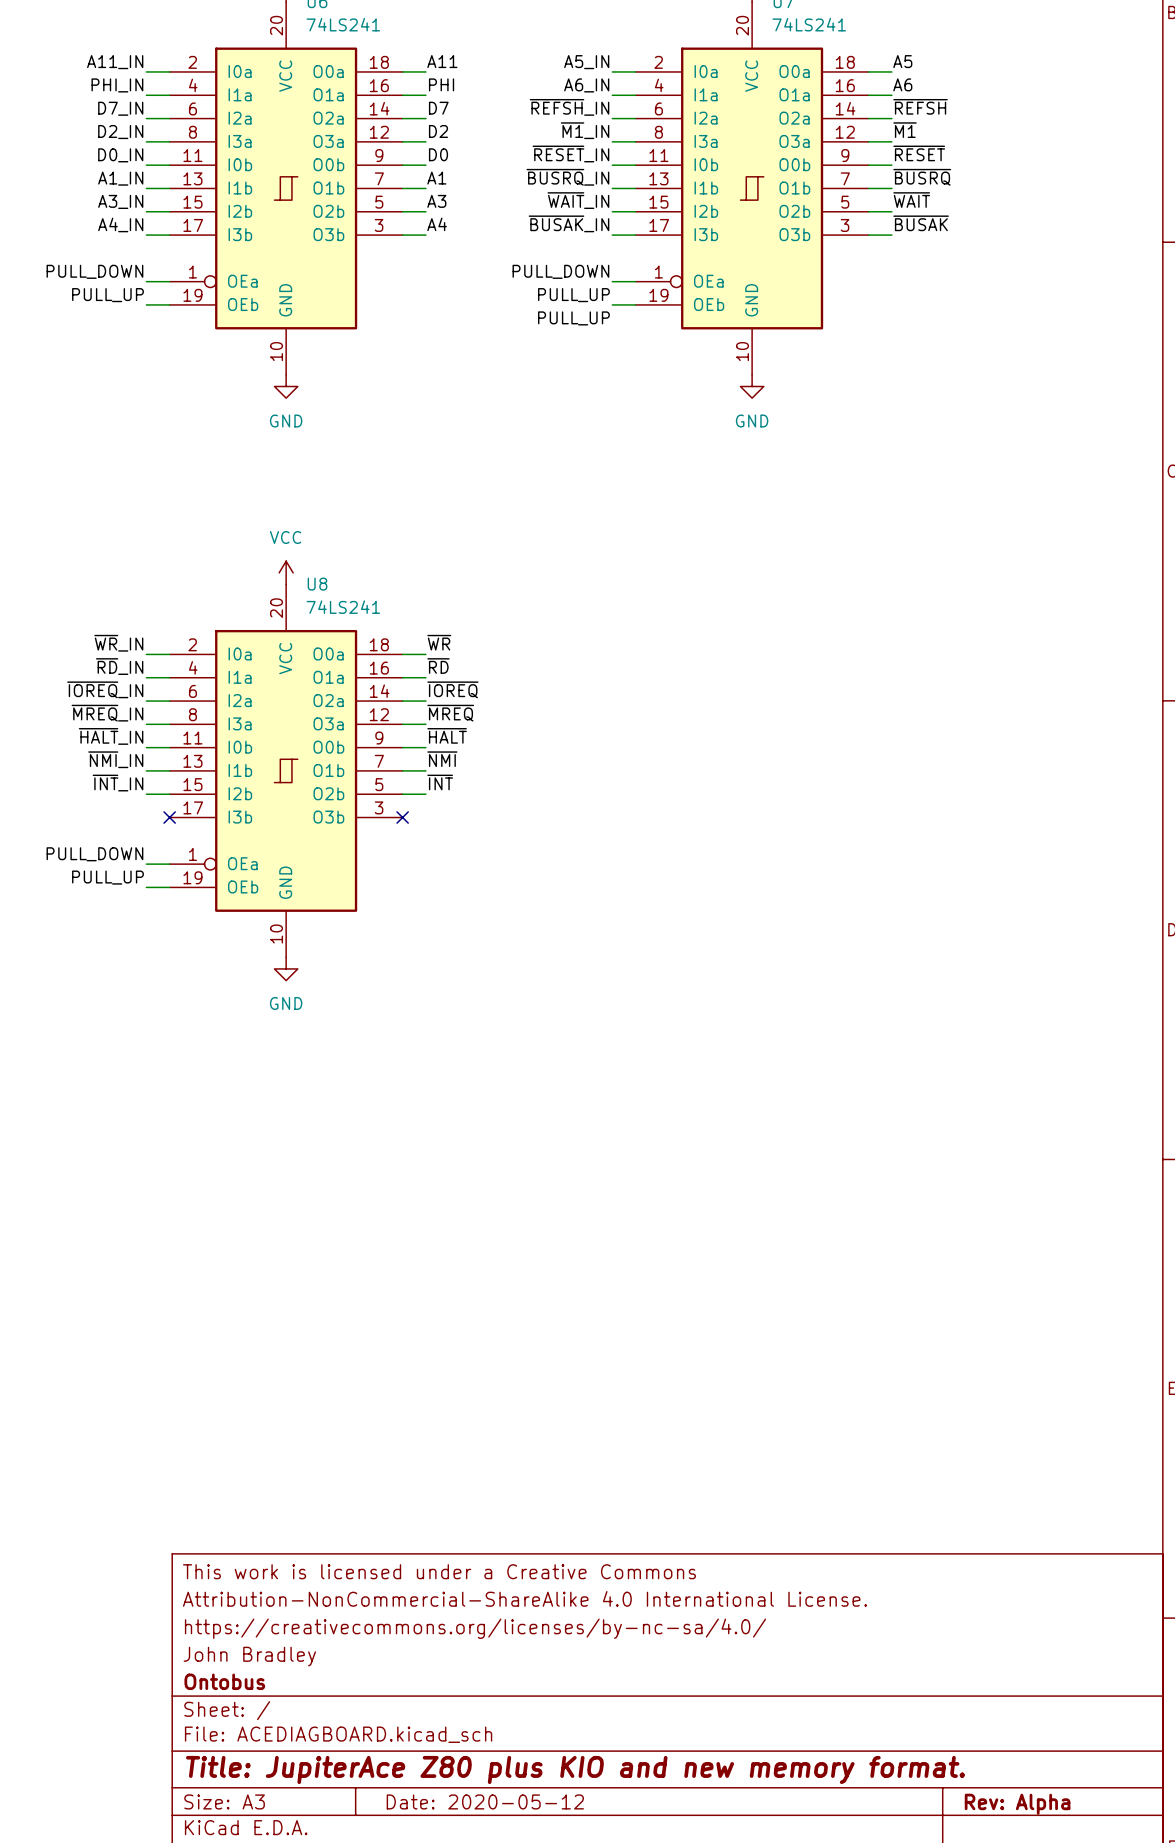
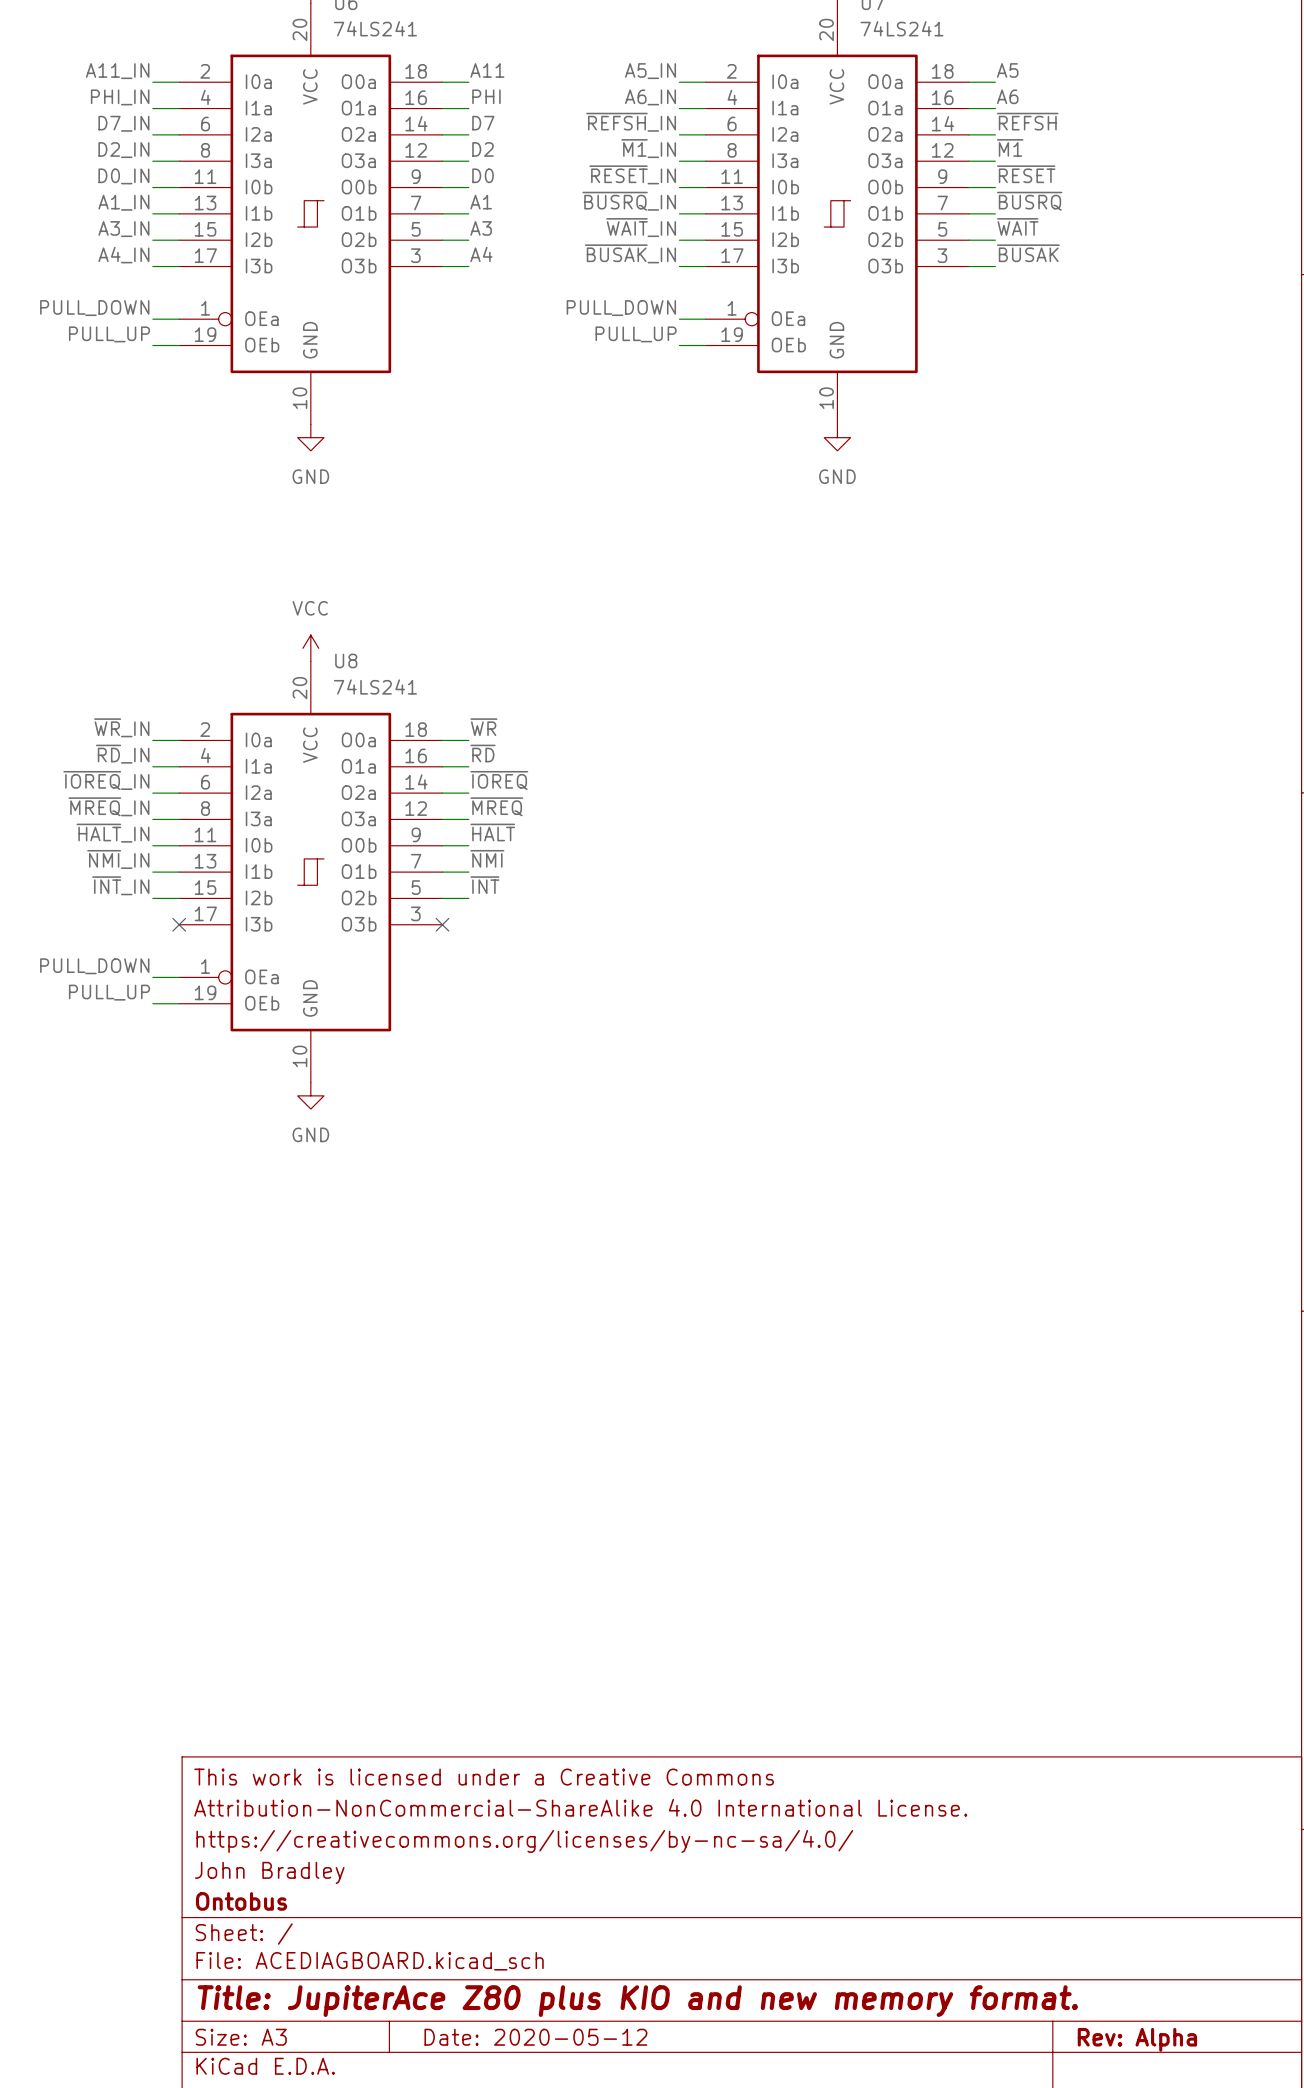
label: PULL_UP (573, 318) -> none

